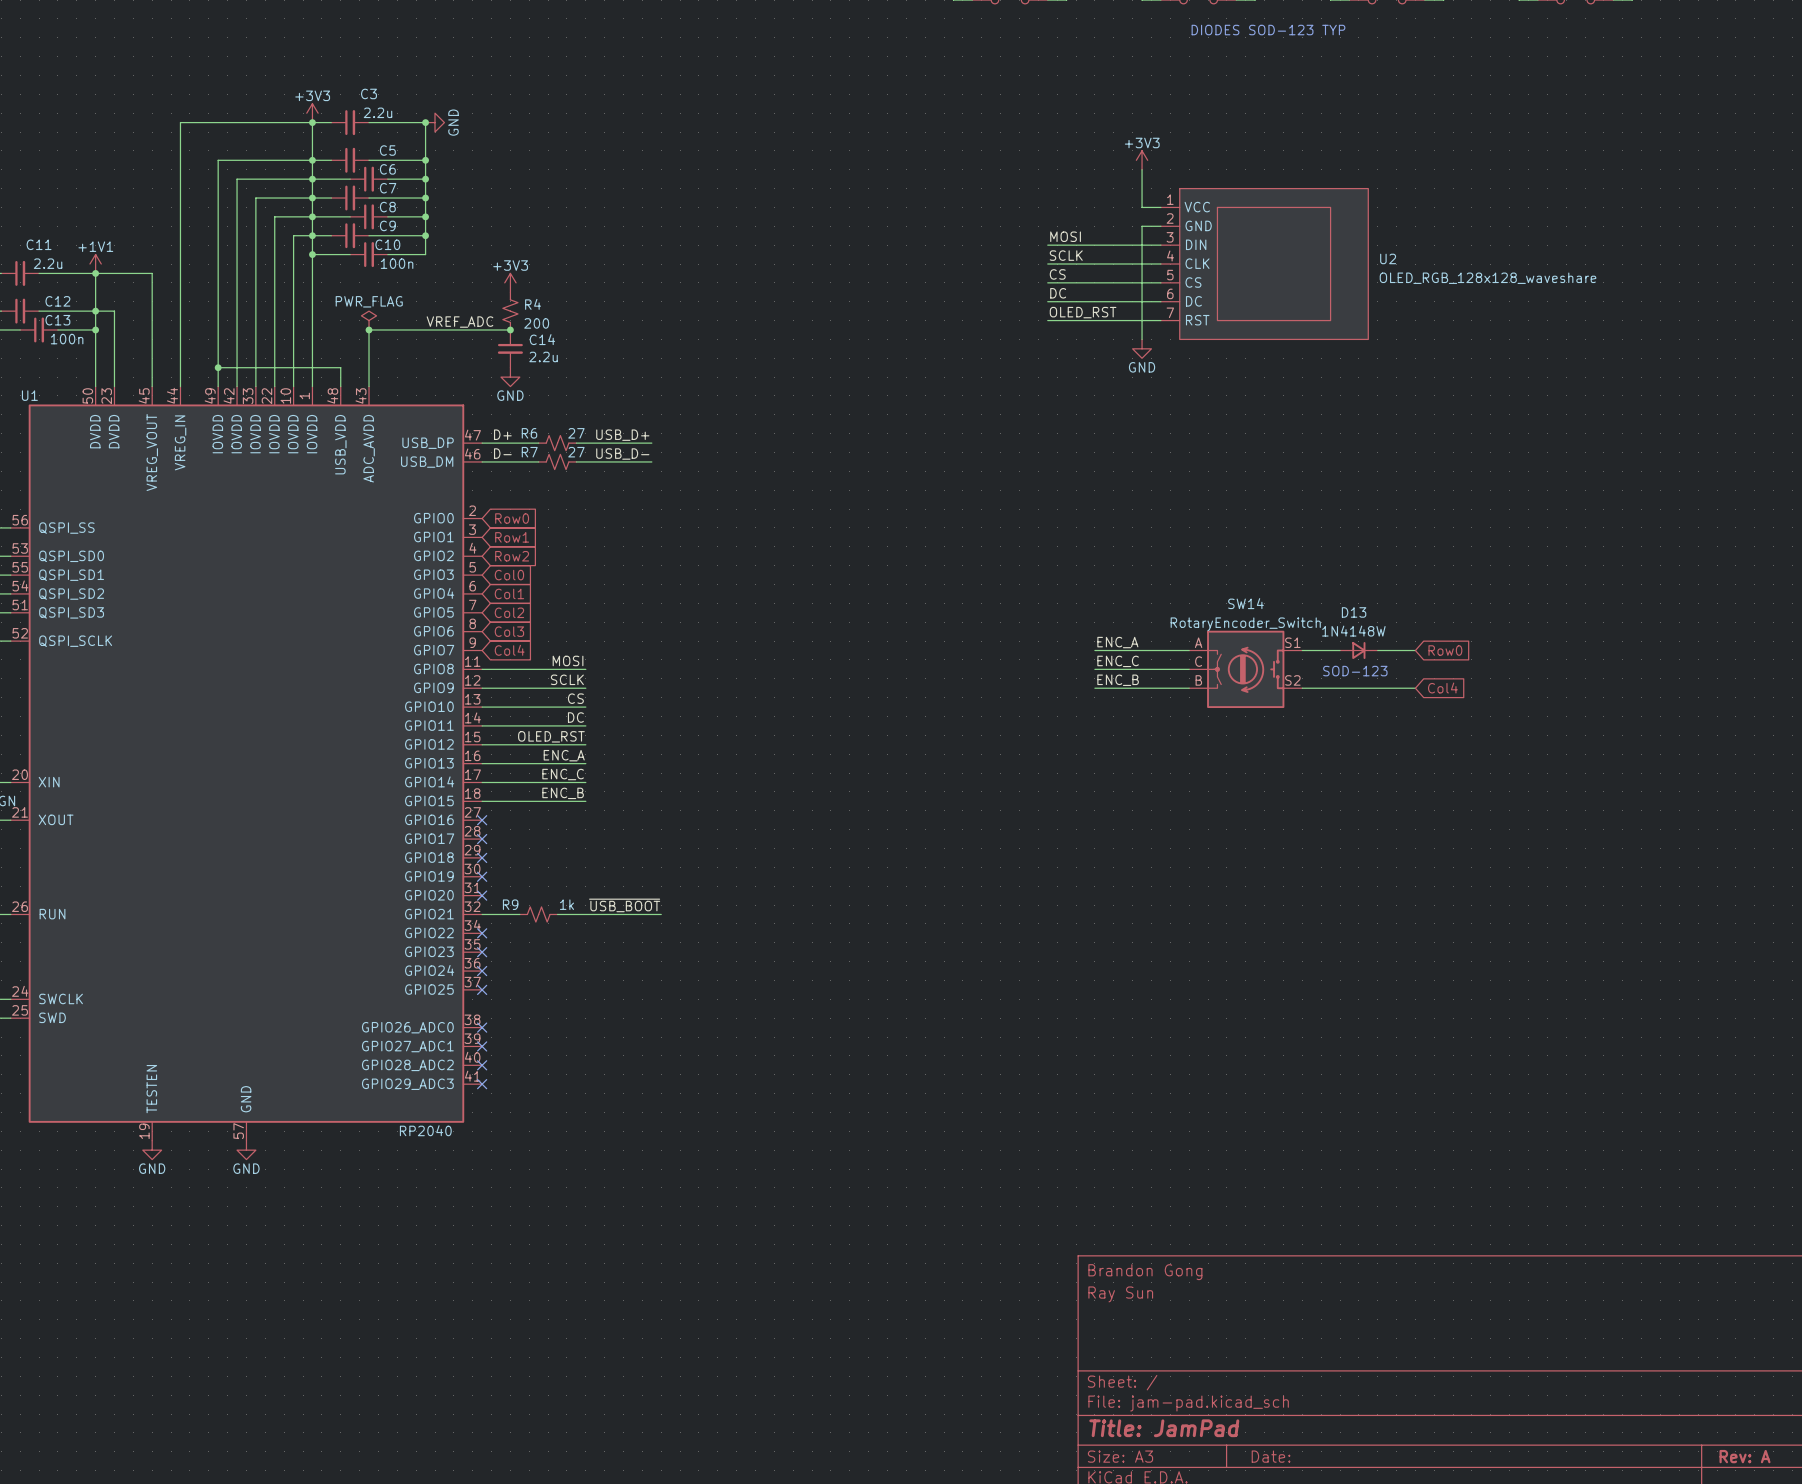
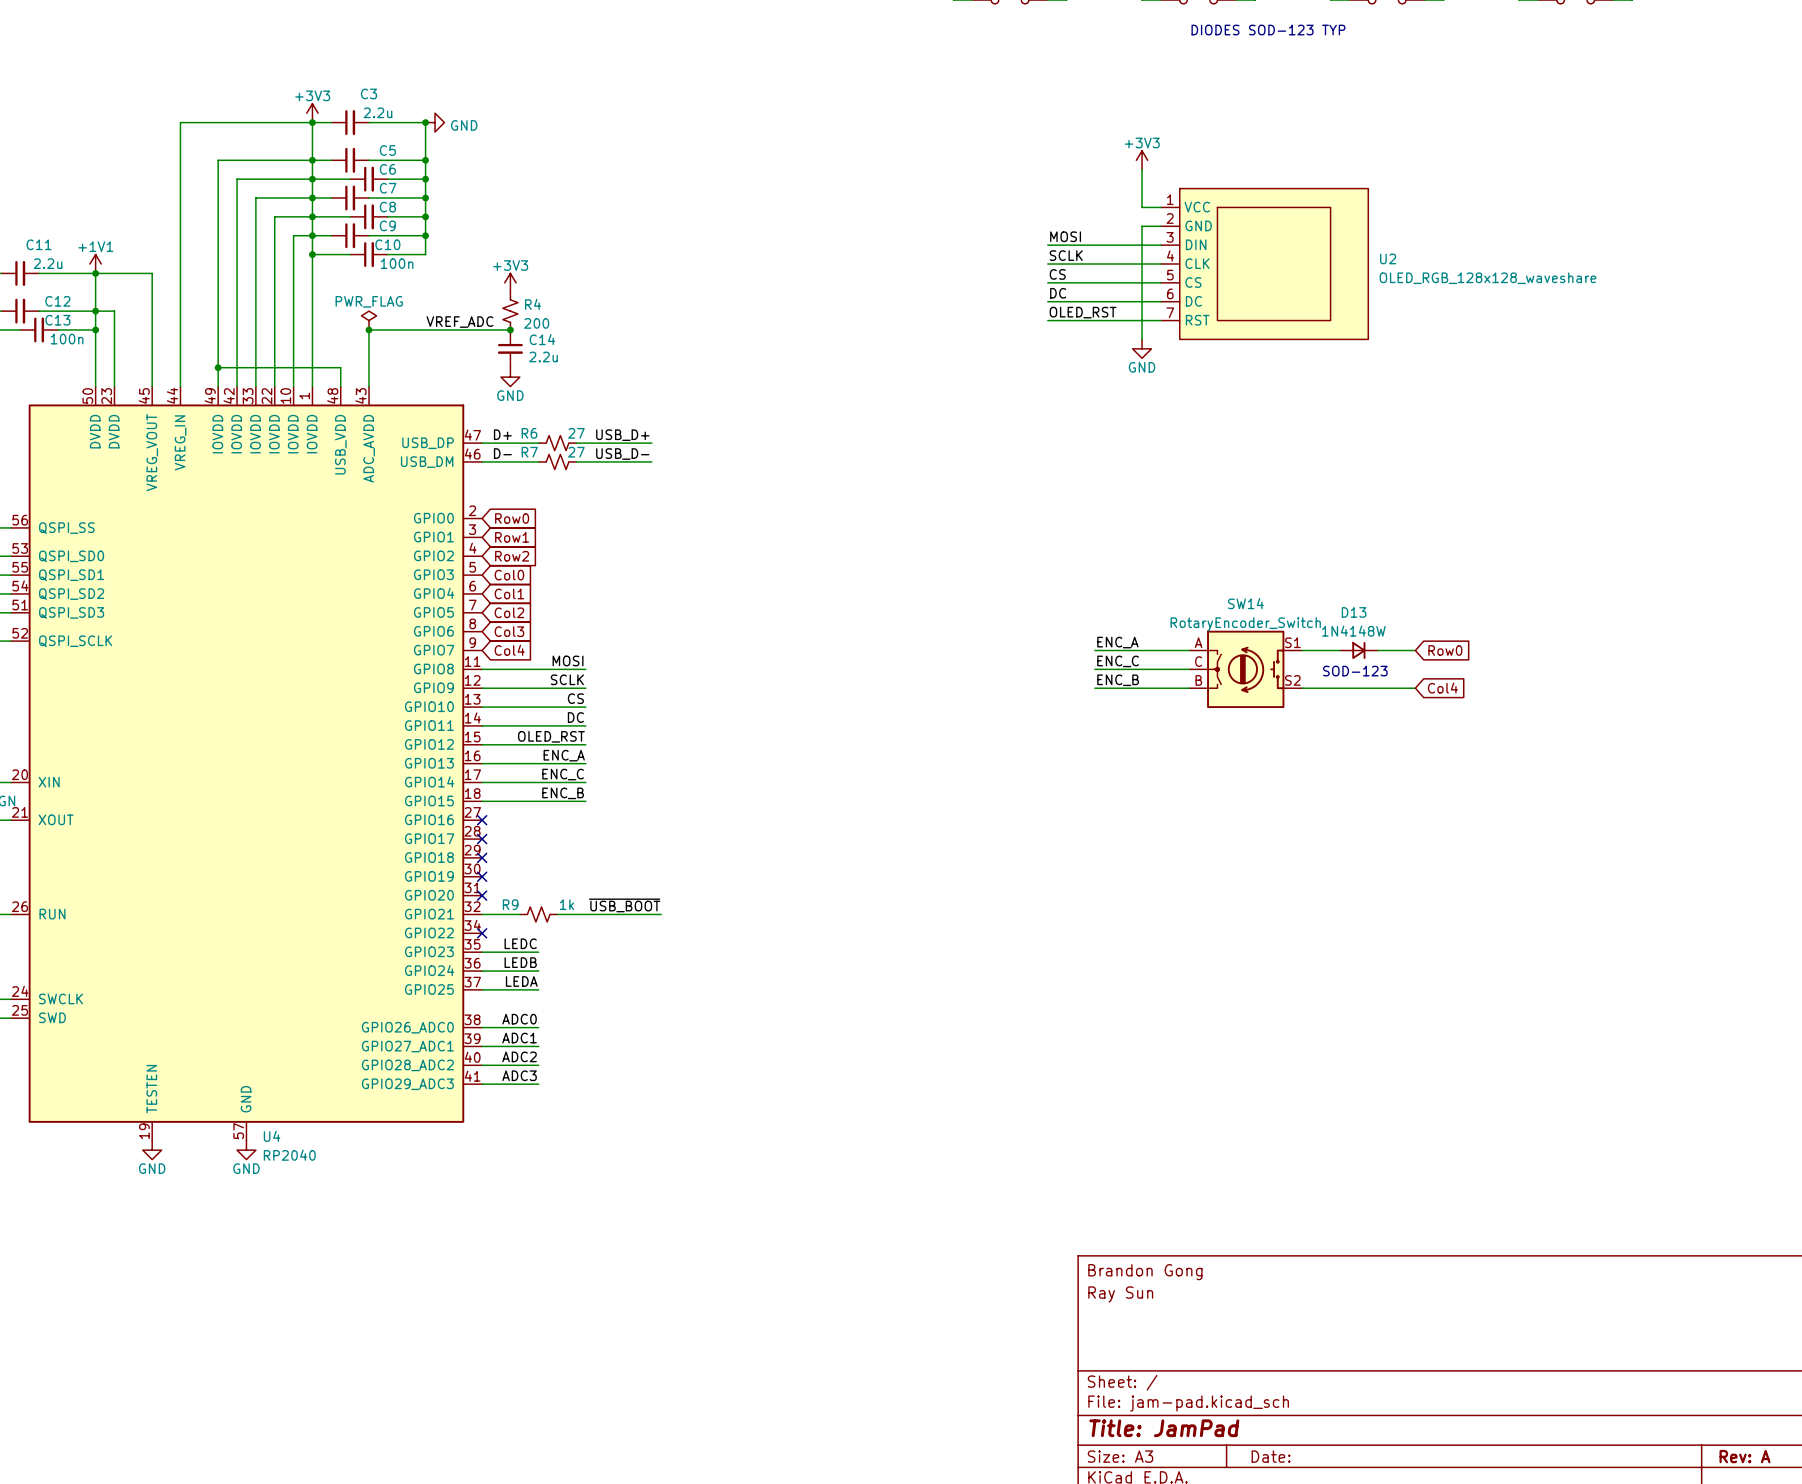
power symbol text rotation: 0° (453, 122) -> 90° clockwise (464, 125)
U1 name: U1 (29, 395) -> U4 (272, 1136)
label: none -> LEDC (520, 943)
wire: none -> (482, 952) (538, 952)
no-connect mark: (482, 952) -> none
label: none -> LEDB (520, 962)
wire: none -> (482, 971) (538, 971)
no-connect mark: (482, 971) -> none
label: none -> LEDA (521, 981)
wire: none -> (482, 989) (538, 989)
no-connect mark: (482, 989) -> none
label: none -> ADC0 (519, 1019)
wire: none -> (482, 1027) (538, 1027)
no-connect mark: (482, 1027) -> none
label: none -> ADC1 (519, 1038)
wire: none -> (482, 1046) (538, 1046)
no-connect mark: (482, 1046) -> none
label: none -> ADC2 (519, 1056)
wire: none -> (482, 1065) (538, 1065)
no-connect mark: (482, 1065) -> none
label: none -> ADC3 (519, 1075)
wire: none -> (482, 1084) (538, 1084)
no-connect mark: (482, 1084) -> none
U1 value position: RP2040 (425, 1130) -> RP2040 (289, 1155)

